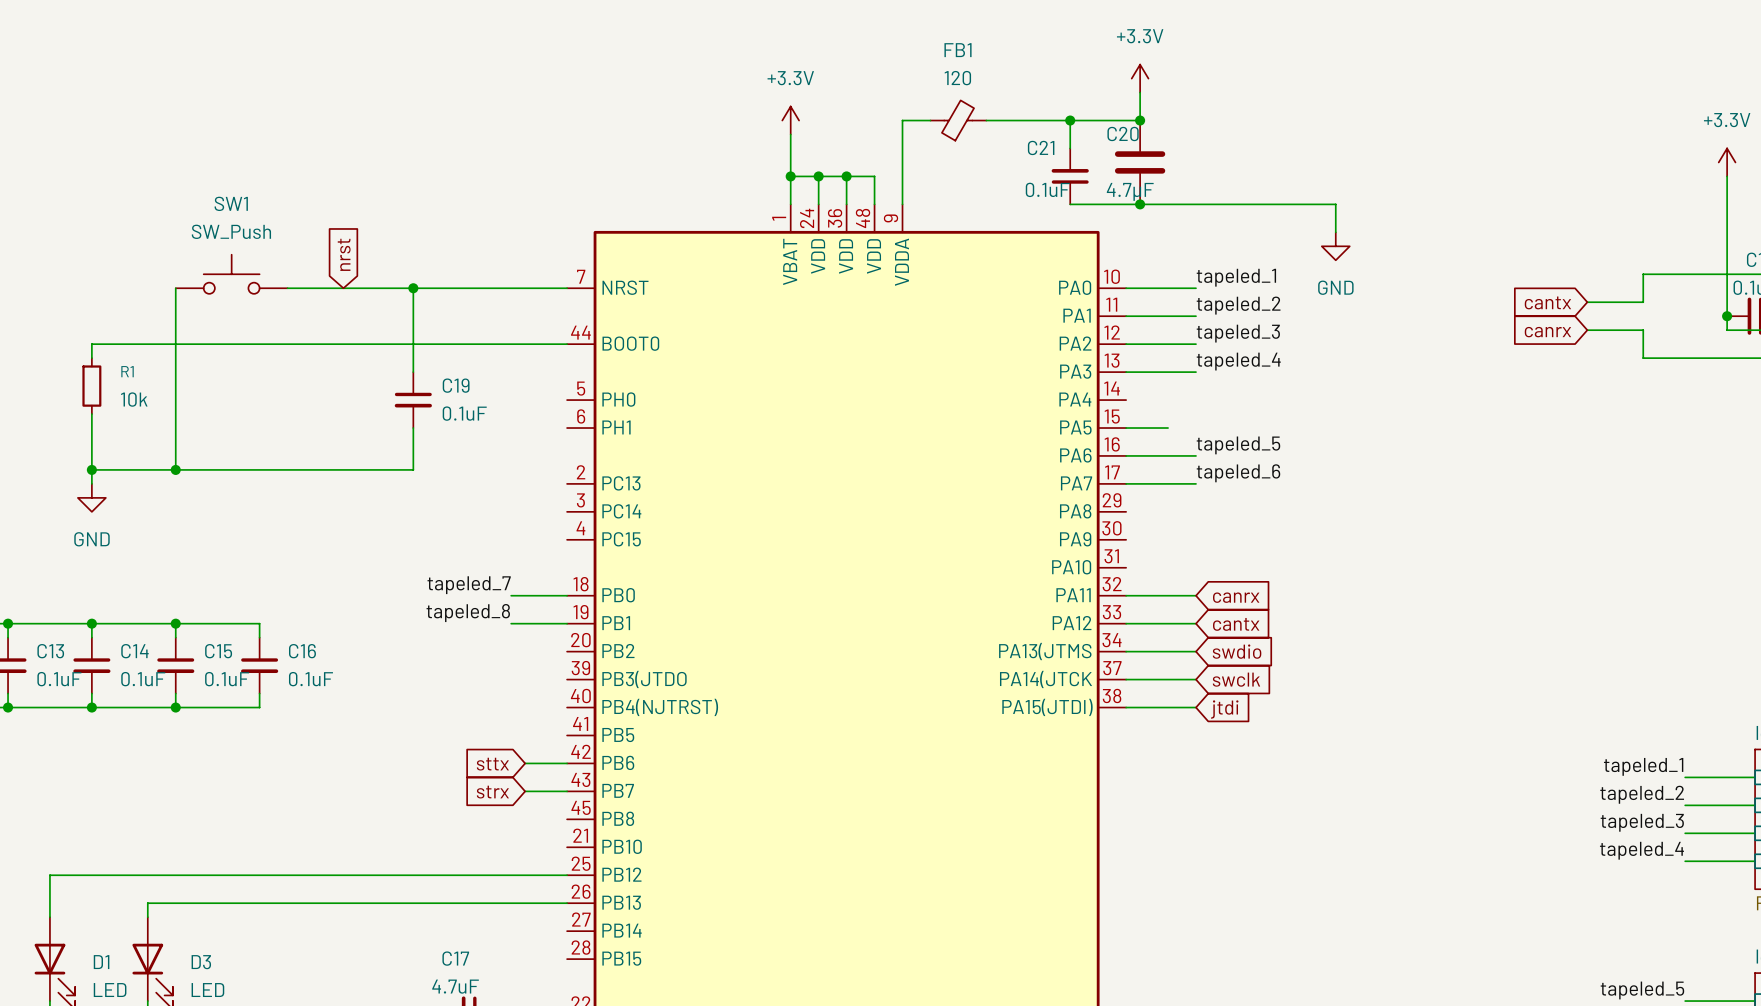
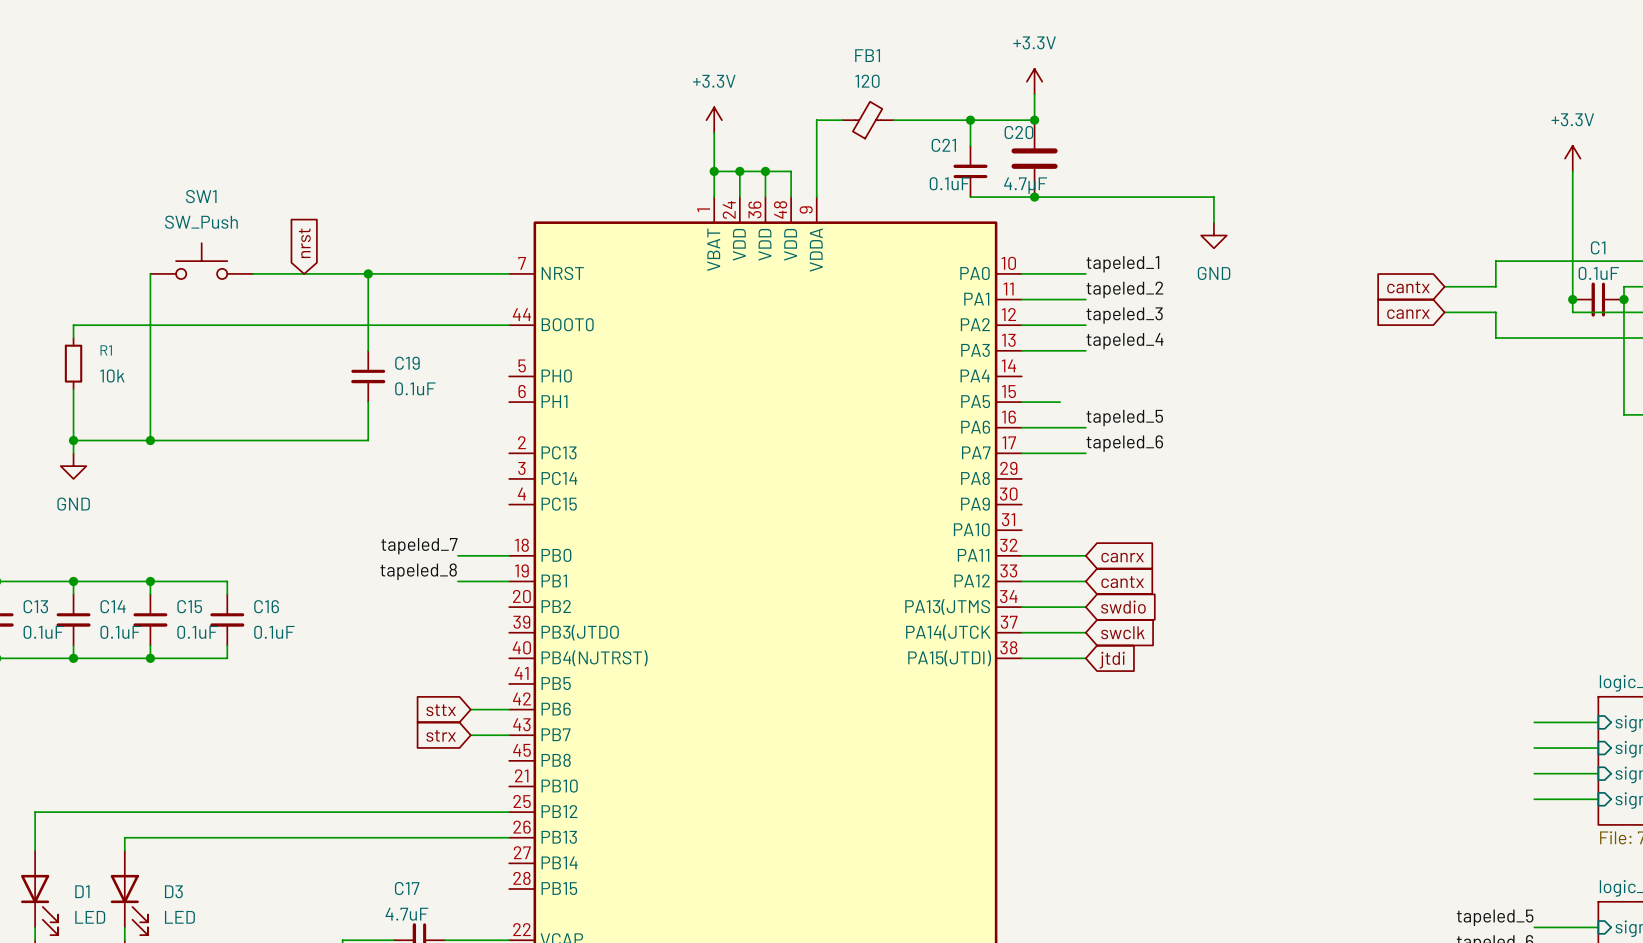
label: tapeled_1 (1643, 766) -> none
label: tapeled_2 (1642, 794) -> none
label: tapeled_3 (1642, 822) -> none
label: tapeled_4 (1641, 850) -> none

